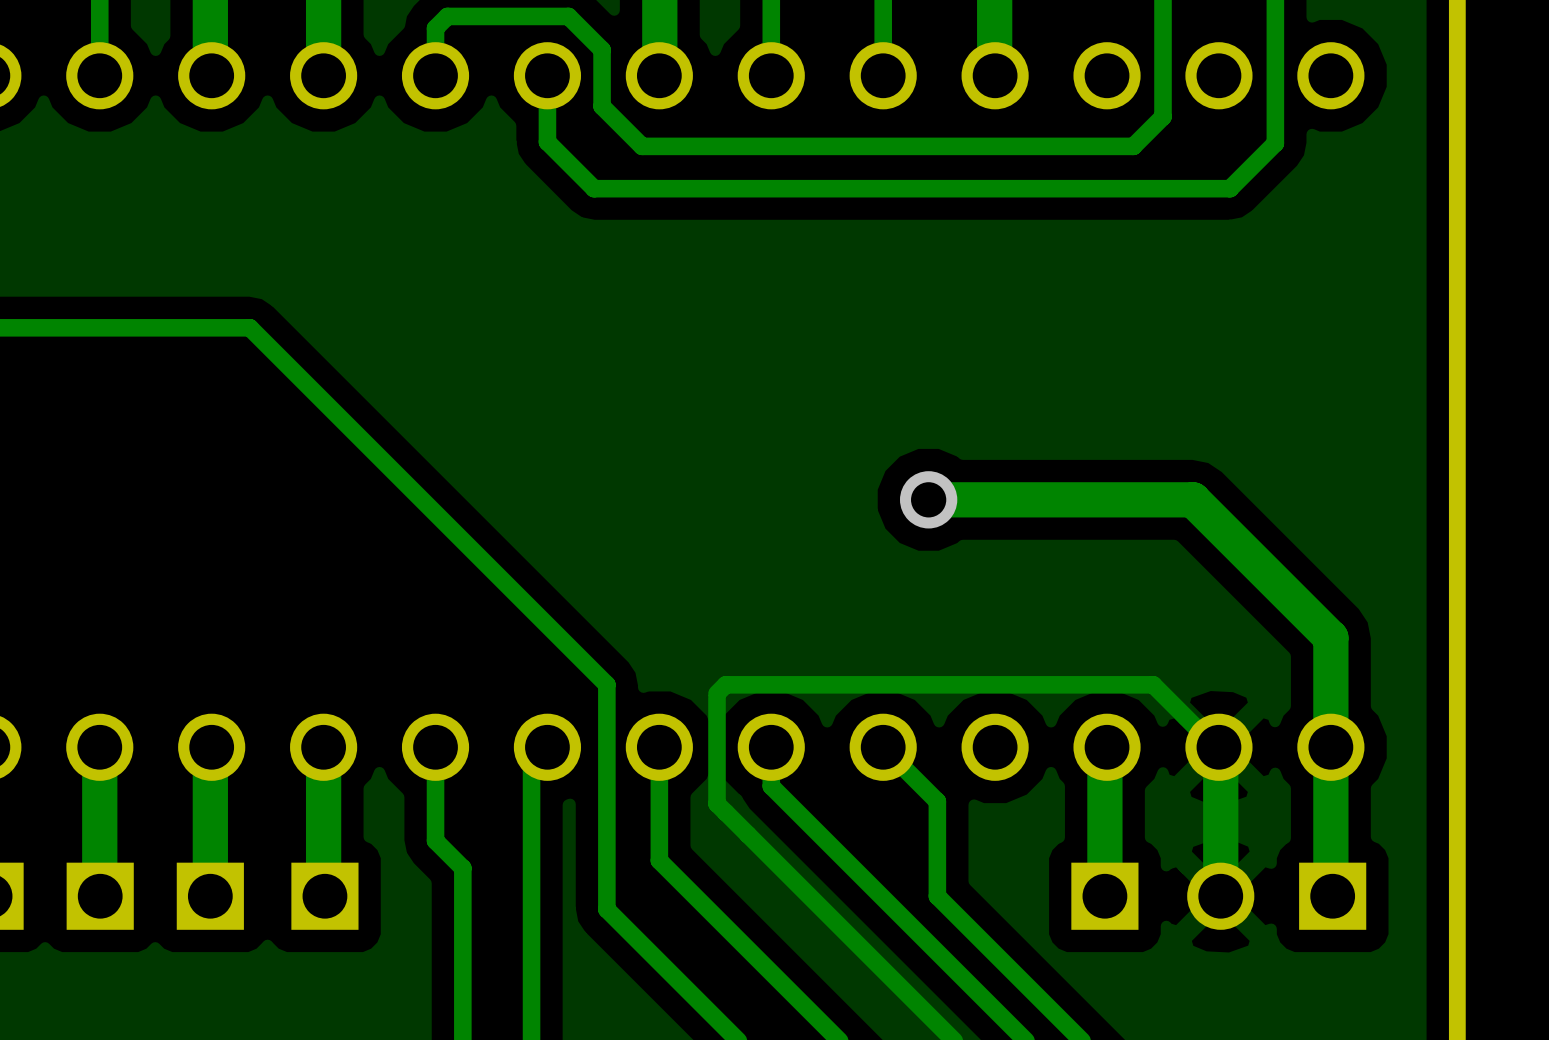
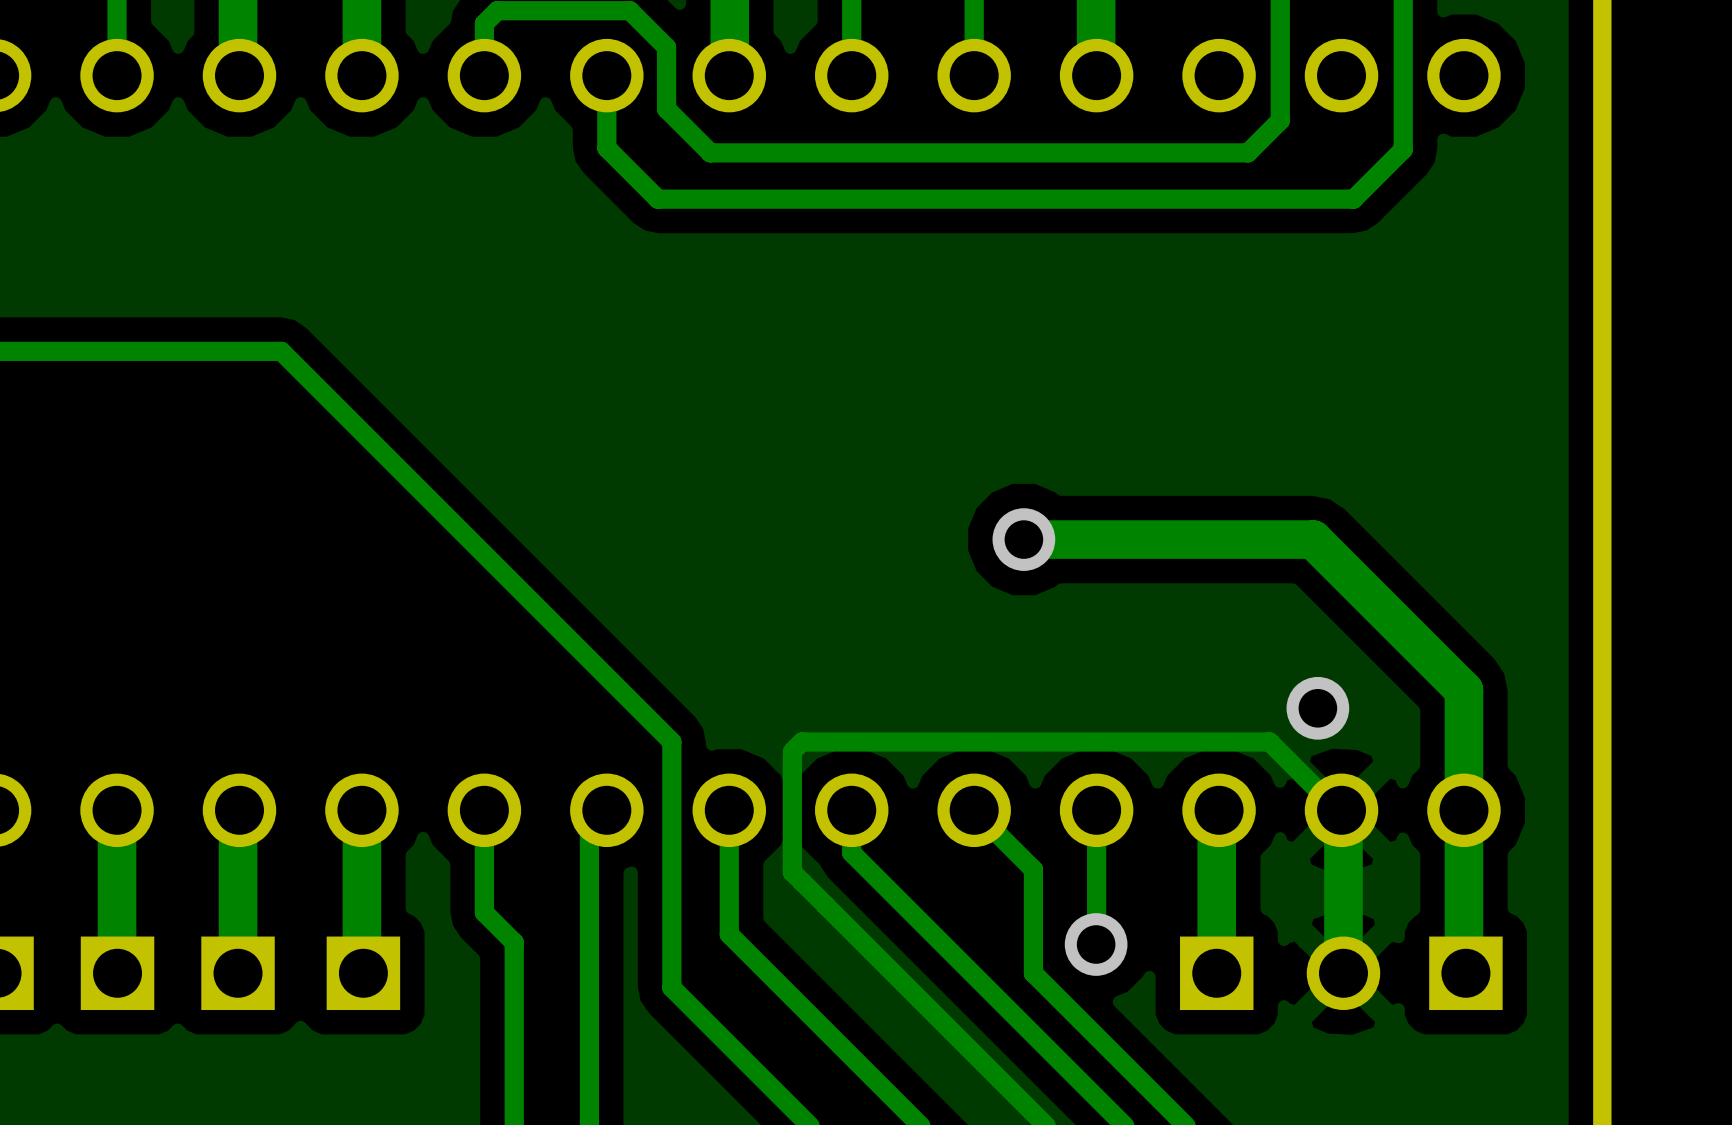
via: none -> (1317, 708)
track: none -> (1096, 810) (1096, 939)
via: none -> (1096, 944)

